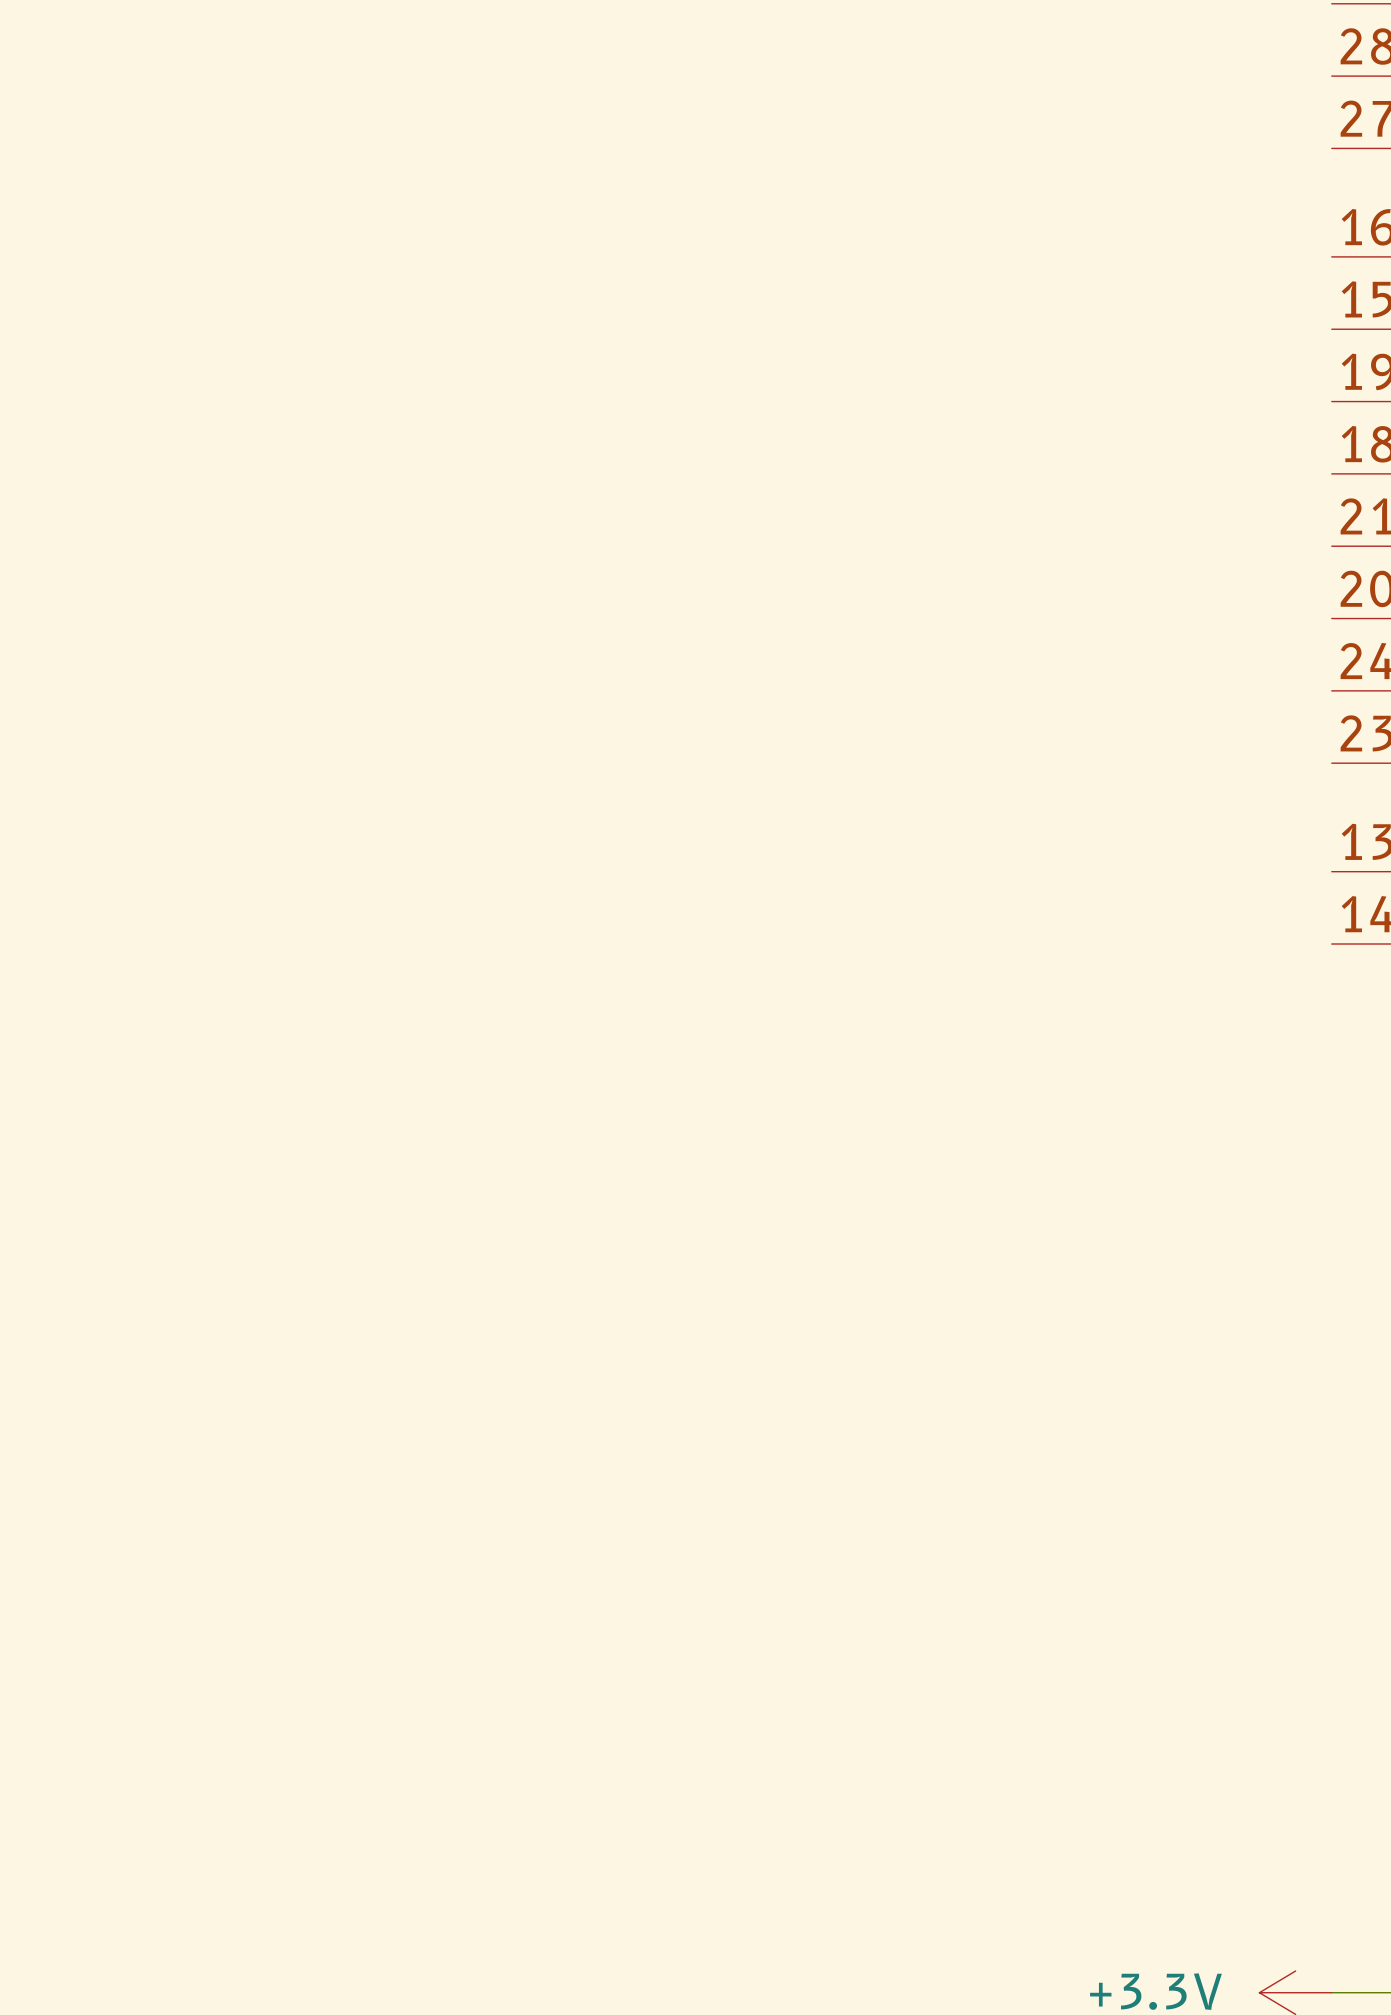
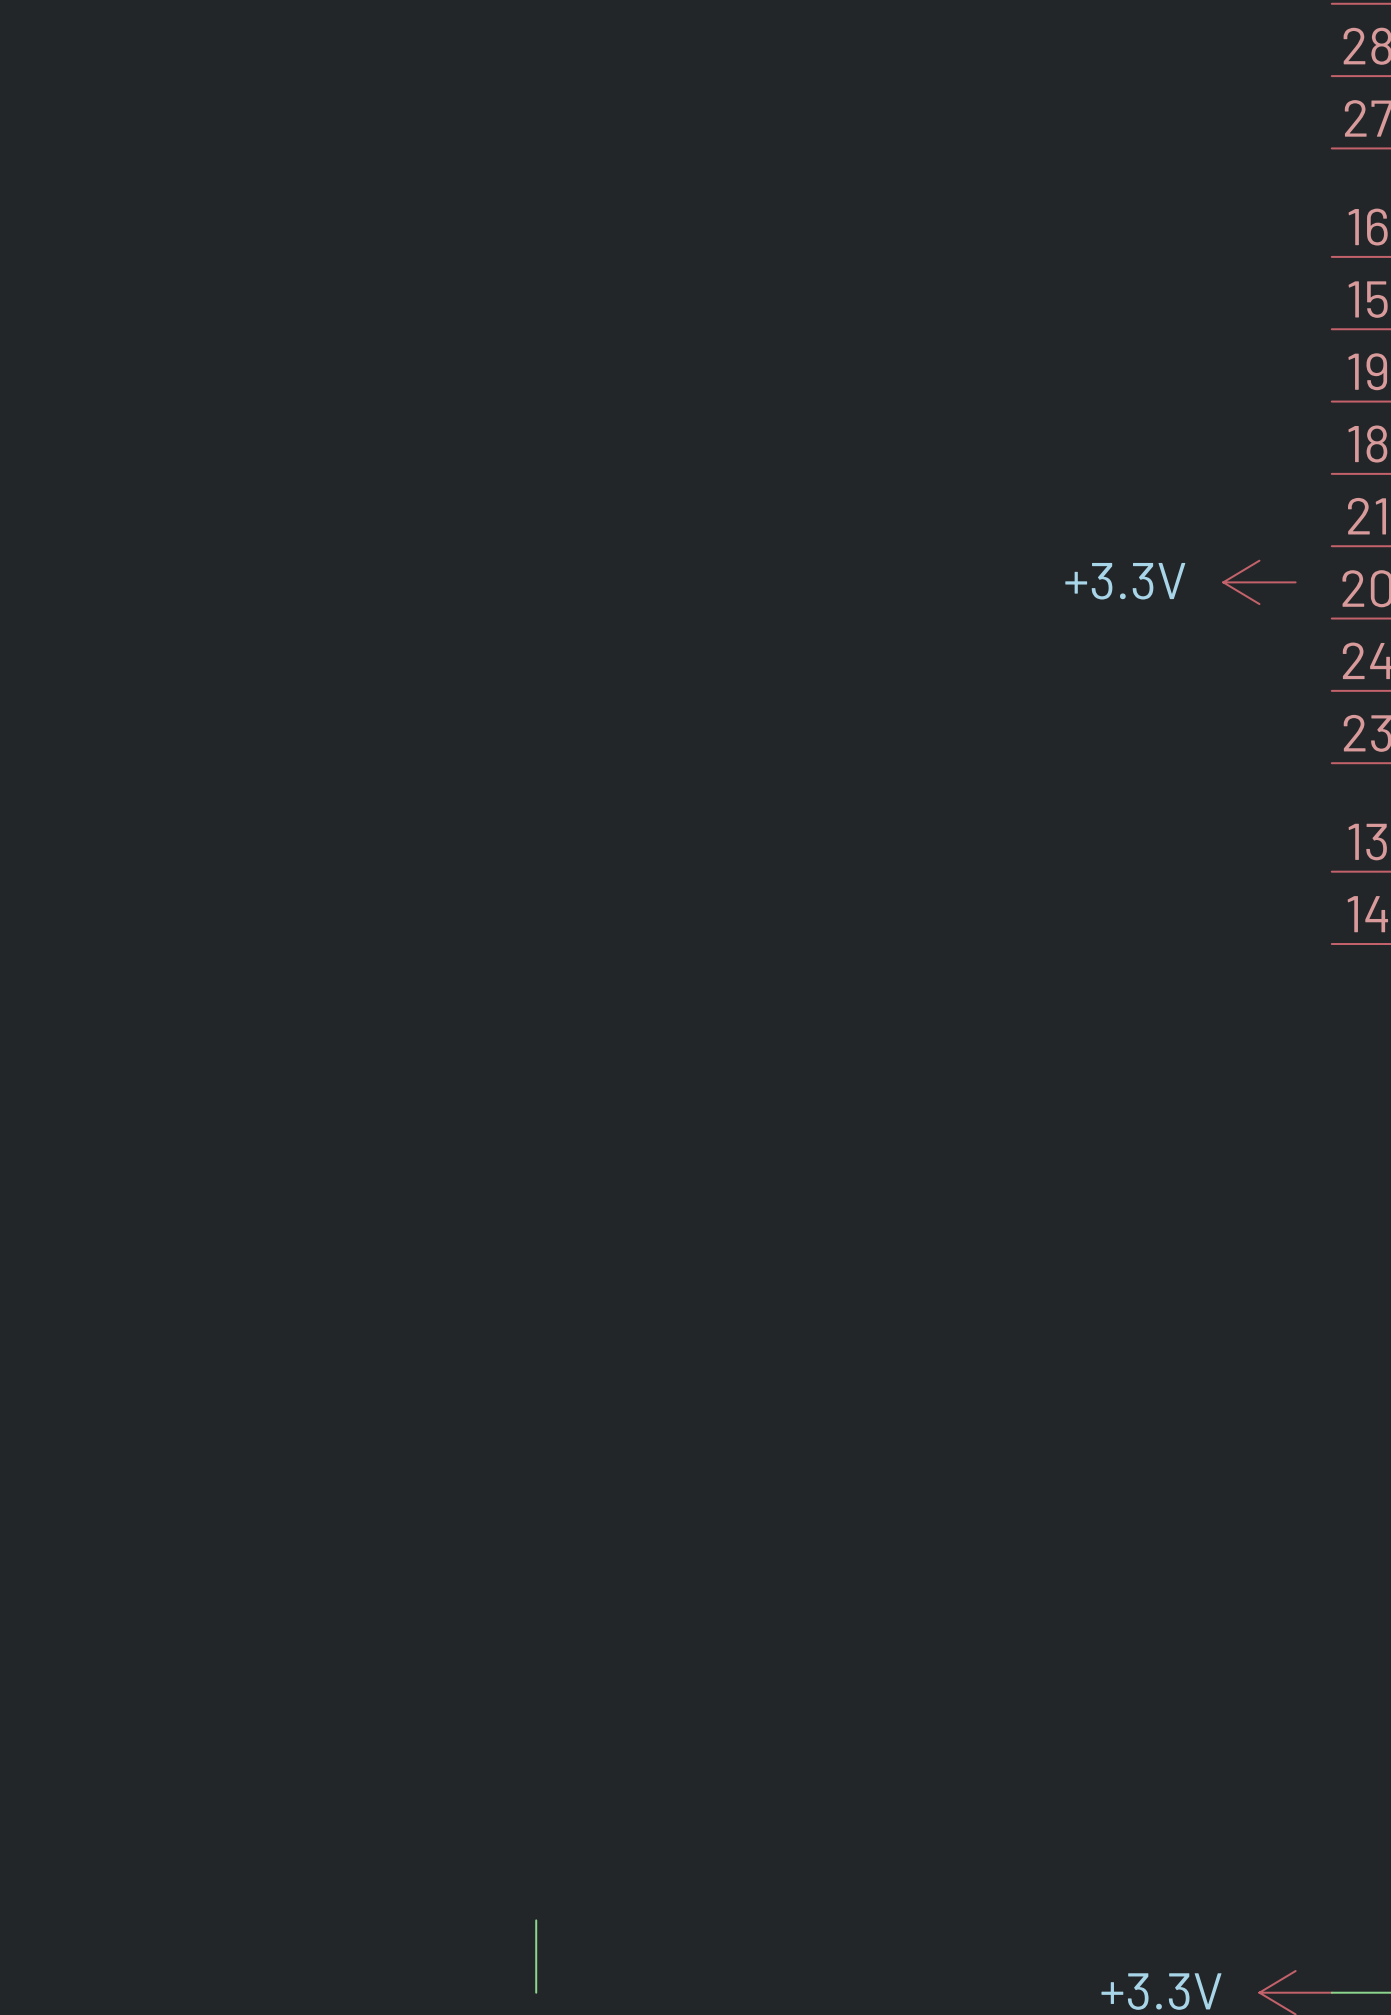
power symbol: none -> +3.3V (1259, 582)
wire: none -> (536, 1920) (536, 1992)

